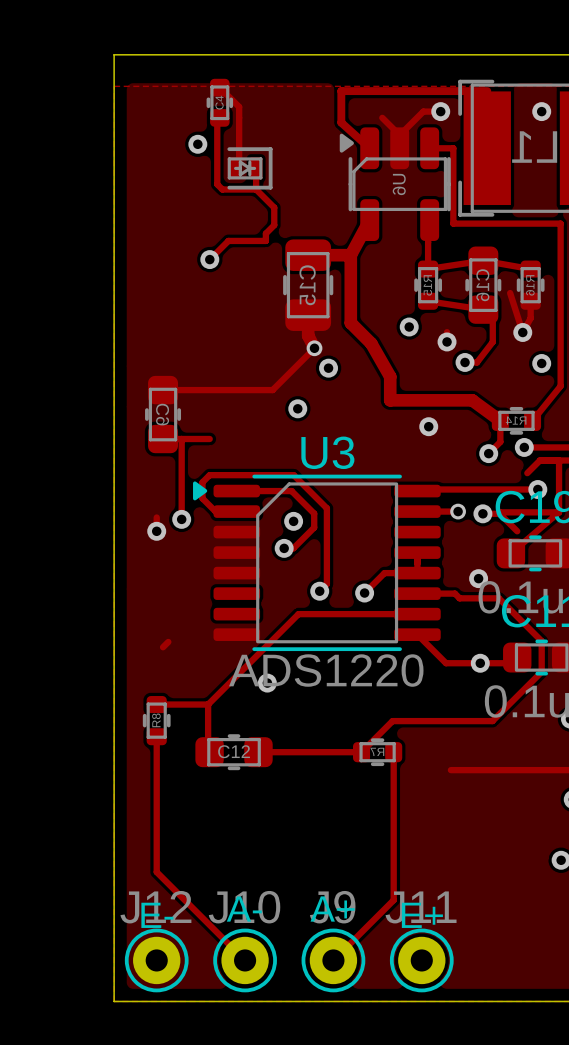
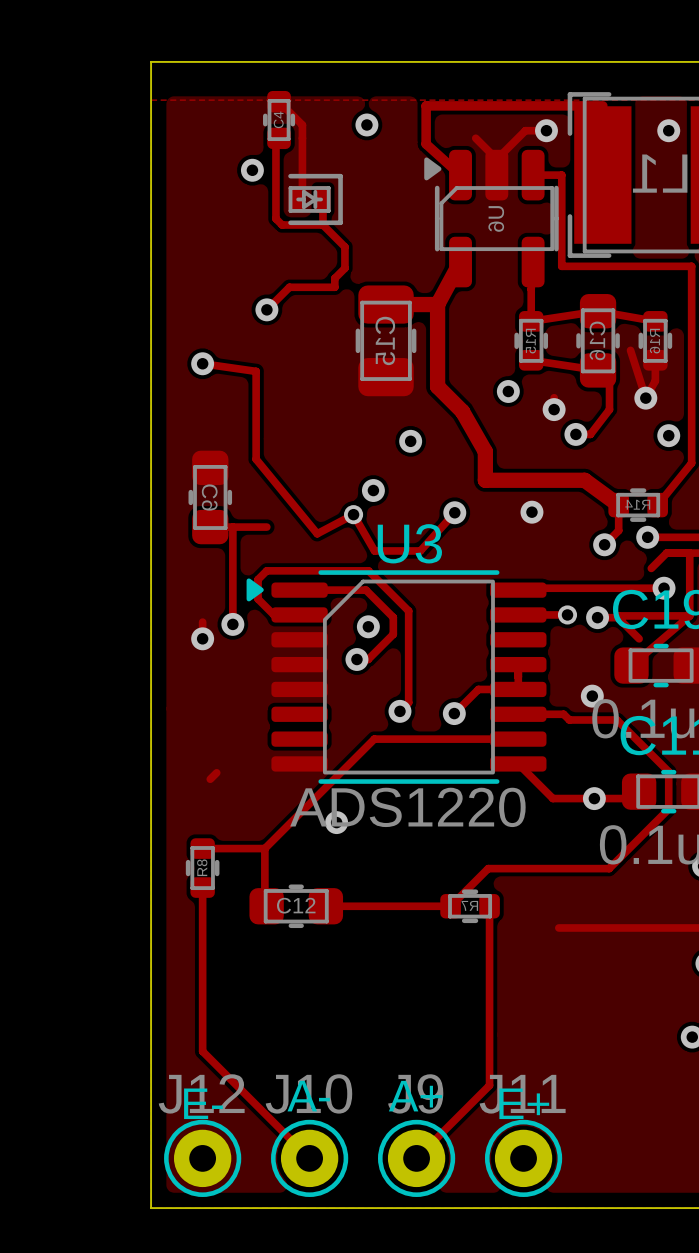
via: none -> (366, 124)
track: none -> (202, 363) (256, 371) (256, 459) (317, 533) (353, 514) (374, 550) (420, 550) (454, 512)
via: none -> (202, 363)
track: (308, 315) (308, 335) (314, 348) (272, 390) (163, 390) -> none
via position: (314, 348) -> (353, 514)
via: none -> (454, 512)

